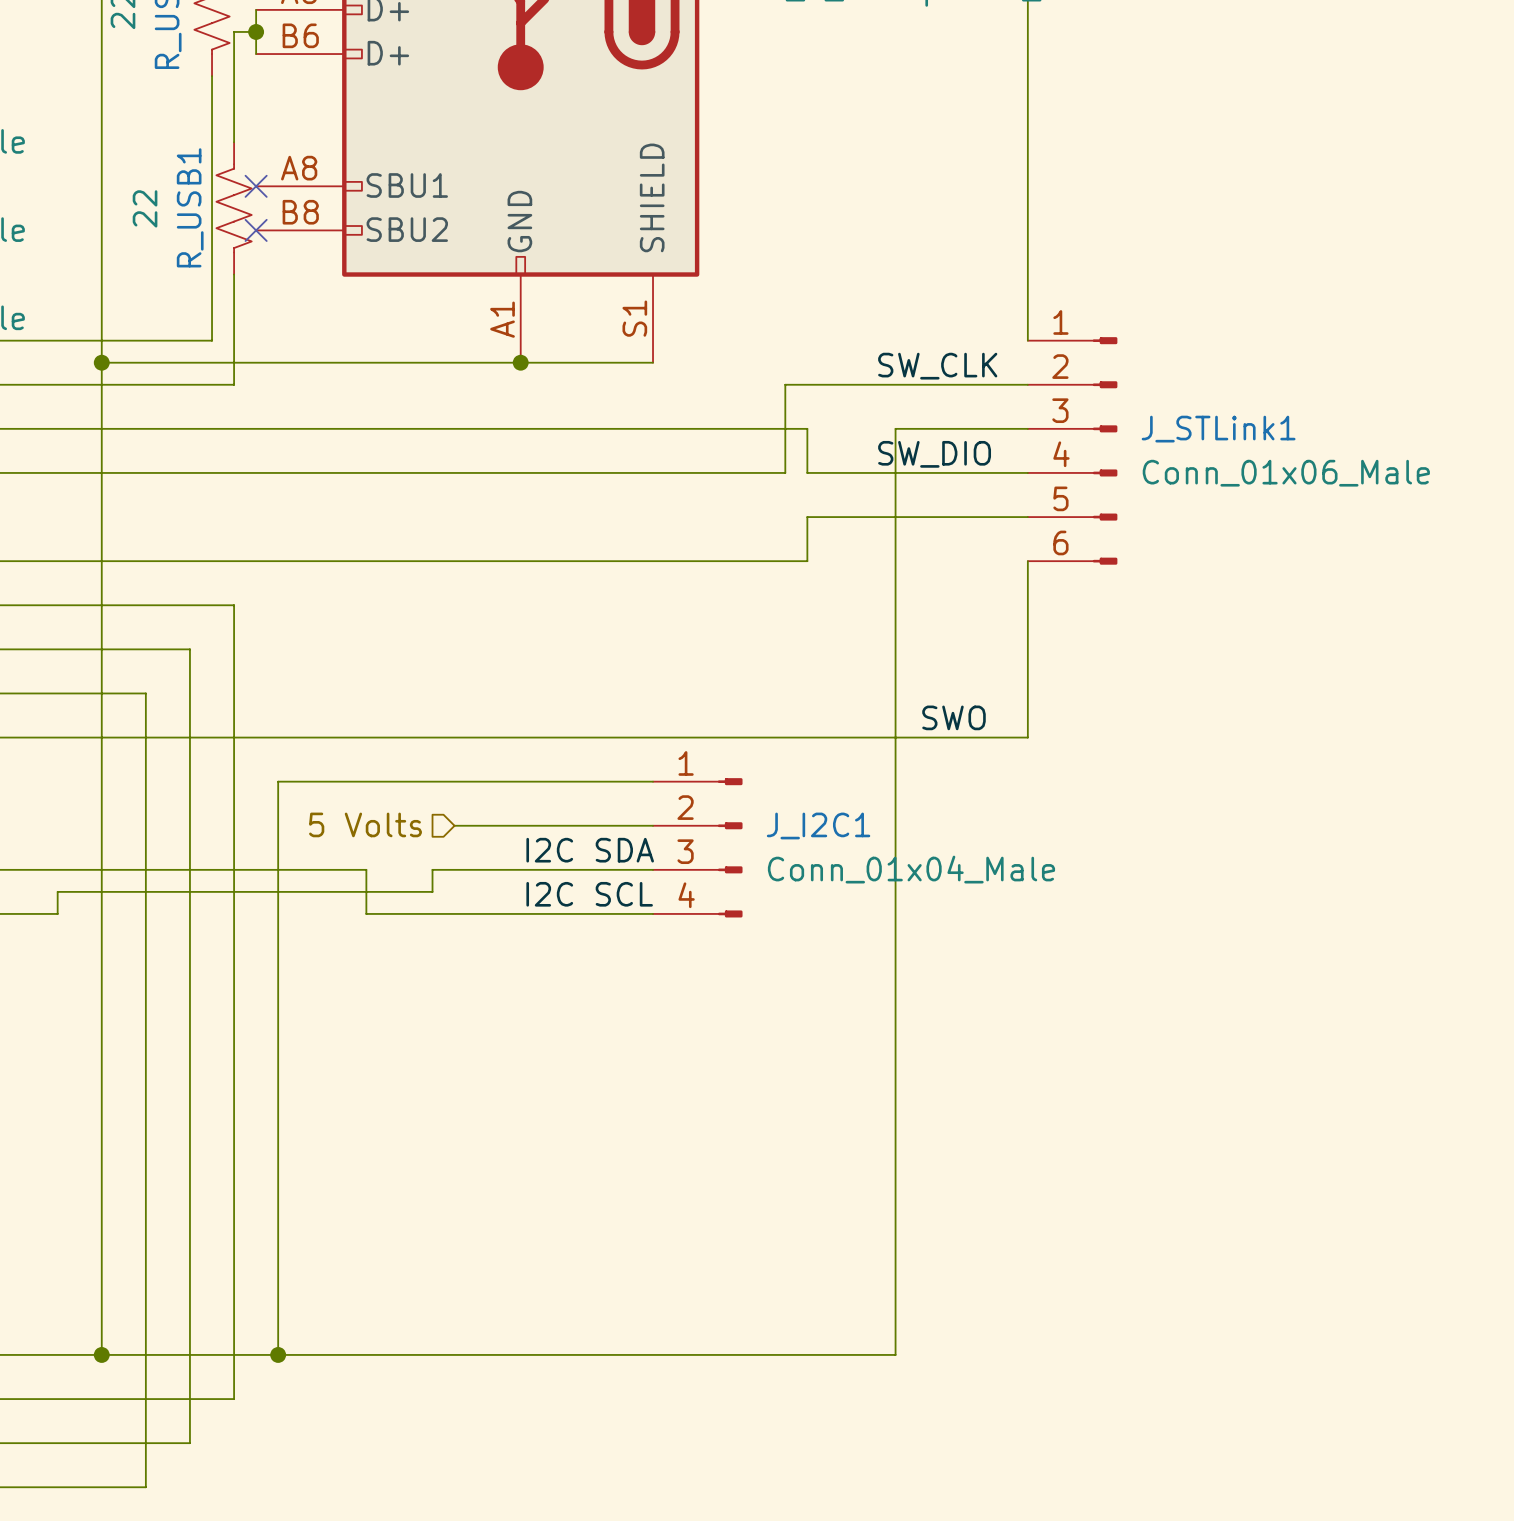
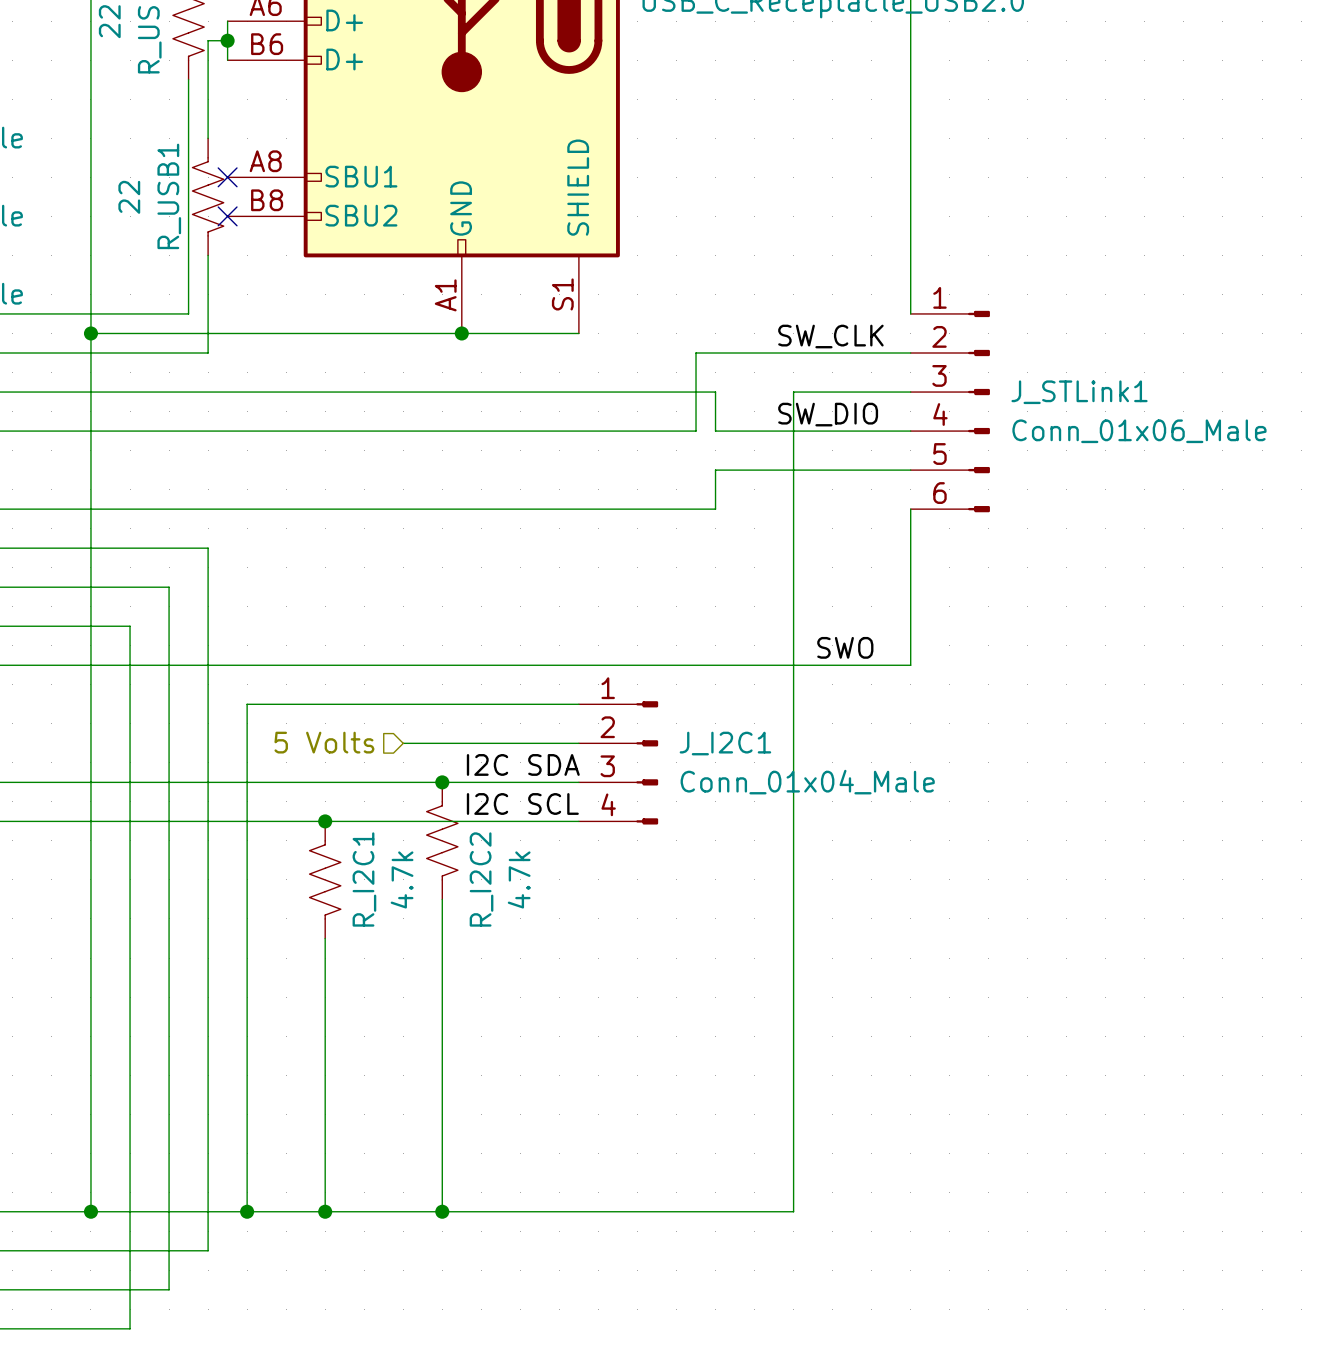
wire: (366, 869) (366, 913) -> (325, 782) (383, 782)
wire: (432, 869) (432, 891) (57, 891) (57, 913) -> (325, 821) (51, 821)
junction: none -> (442, 782)
junction: none -> (325, 821)
R_I2C2: none -> 4.7k (442, 840)
R_I2C1: none -> 4.7k (325, 879)
wire: none -> (442, 899) (442, 1211)
wire: none -> (325, 938) (325, 1211)
junction: none -> (325, 1211)
junction: none -> (442, 1211)

